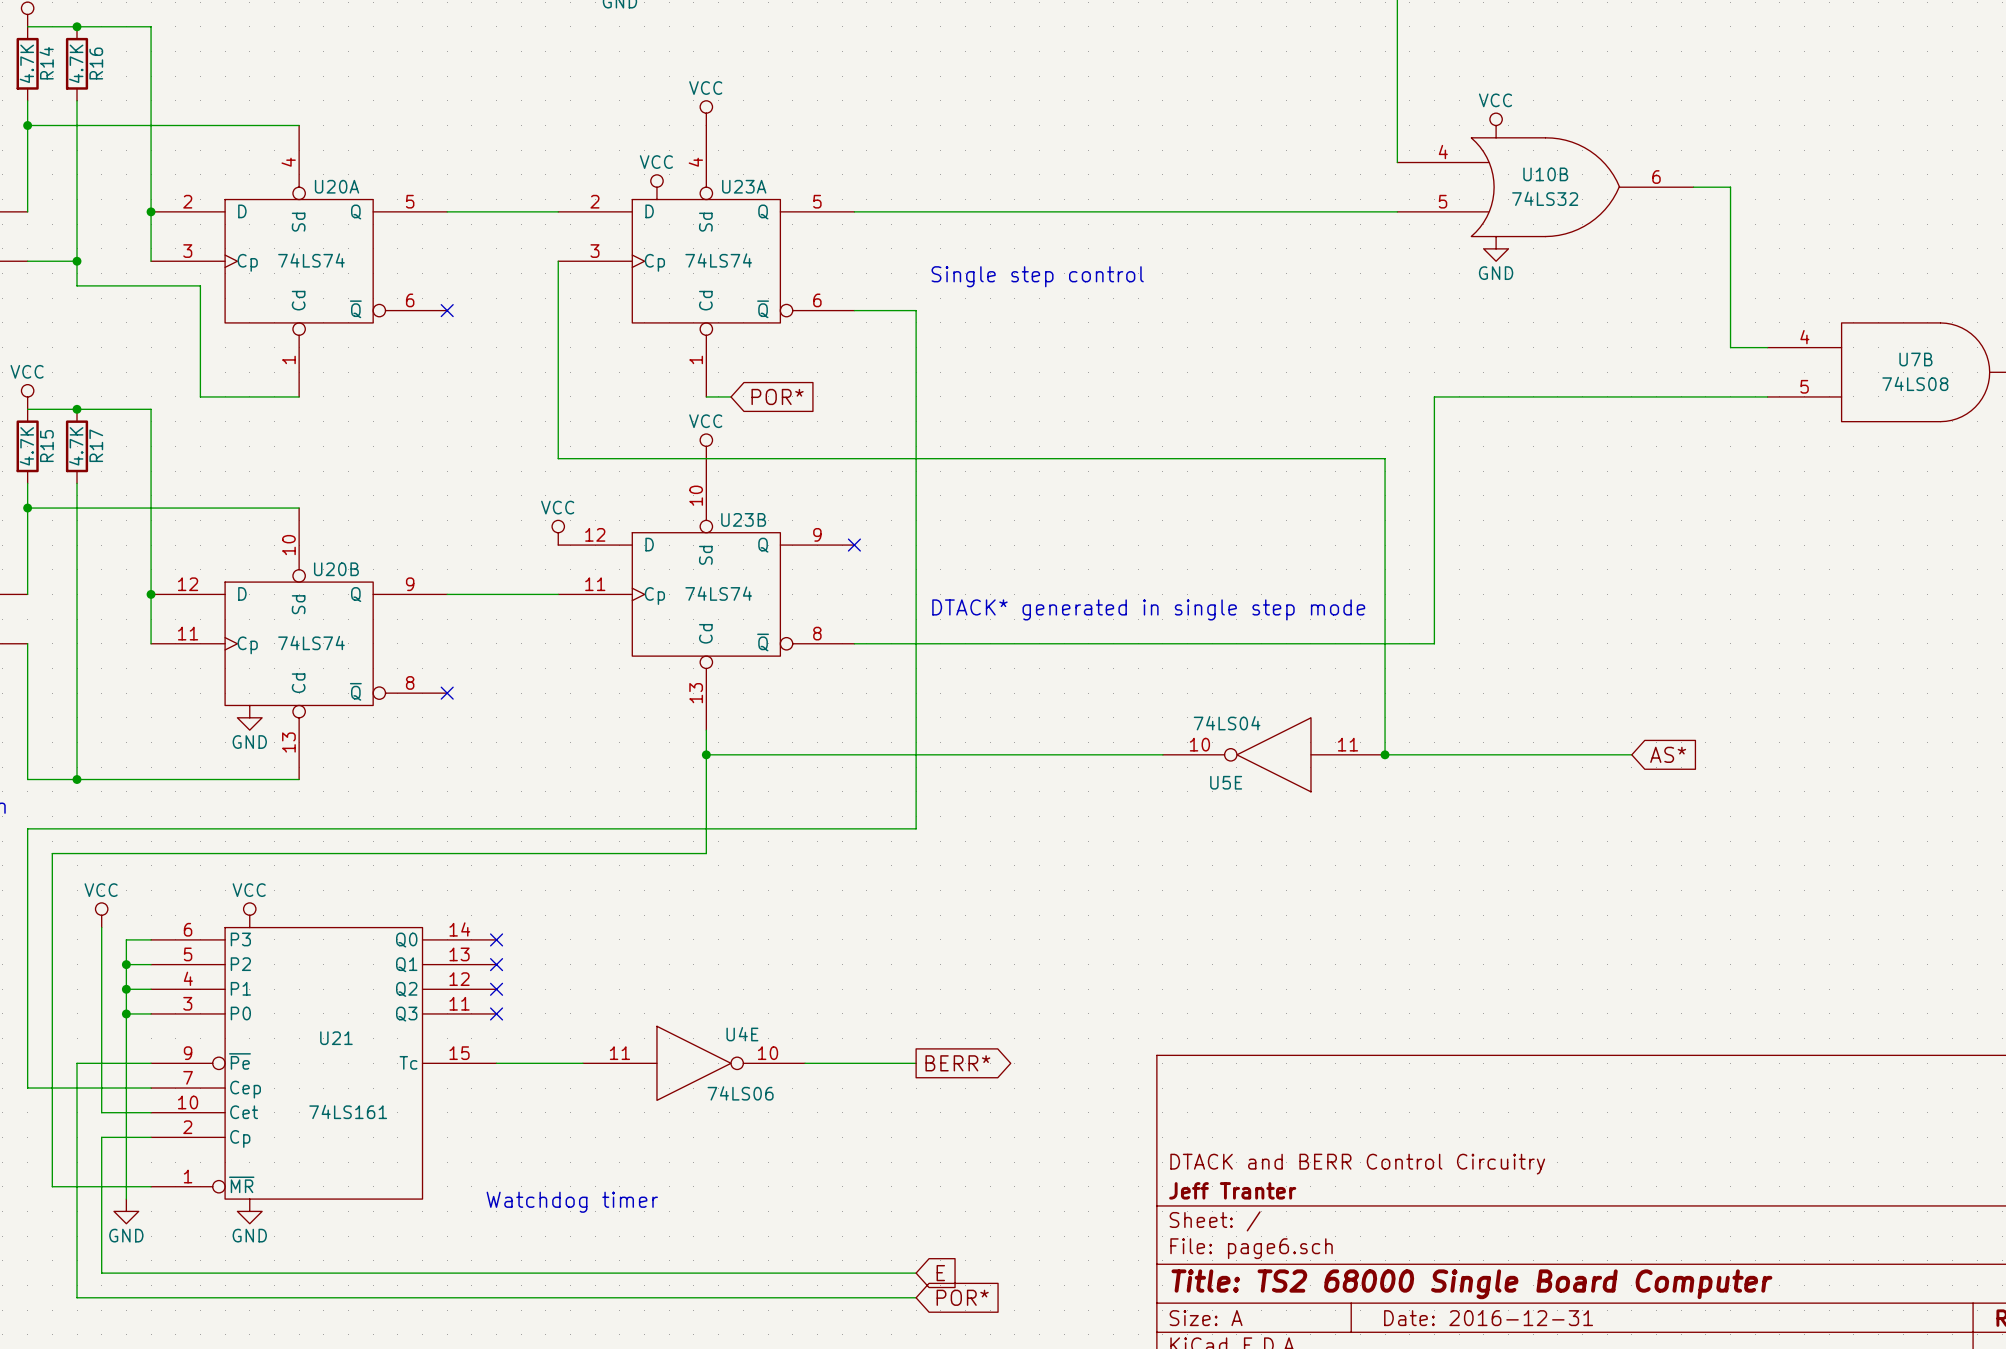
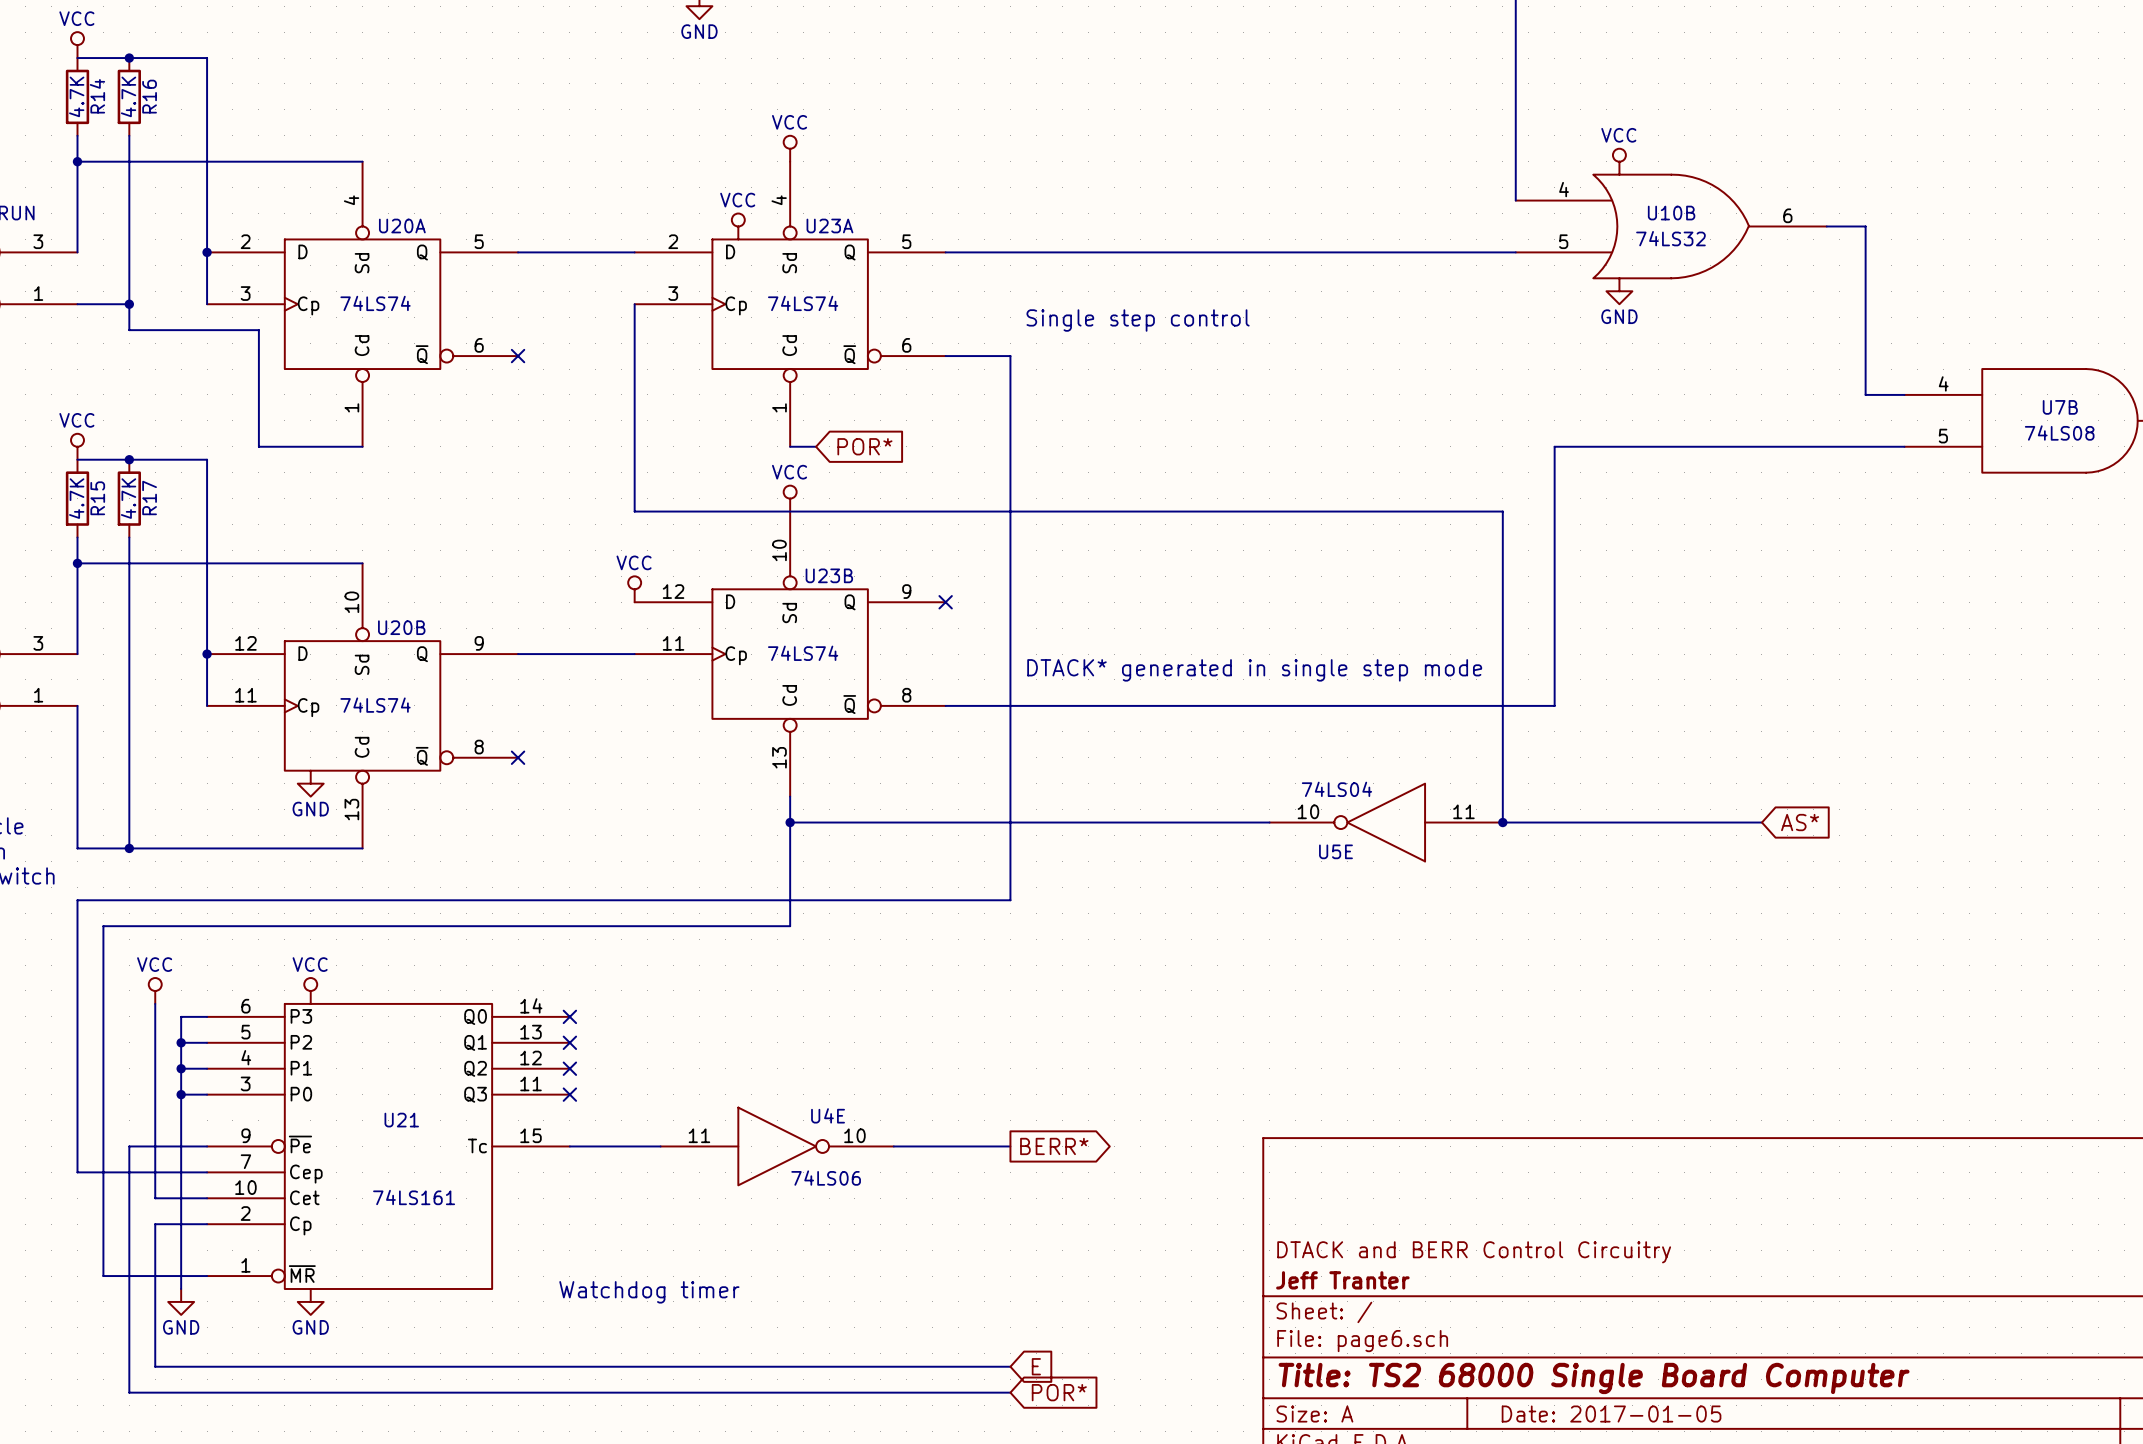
title block: Date: 2016-12-31 (1488, 1318) -> Date: 2017-01-05 (1611, 1414)

